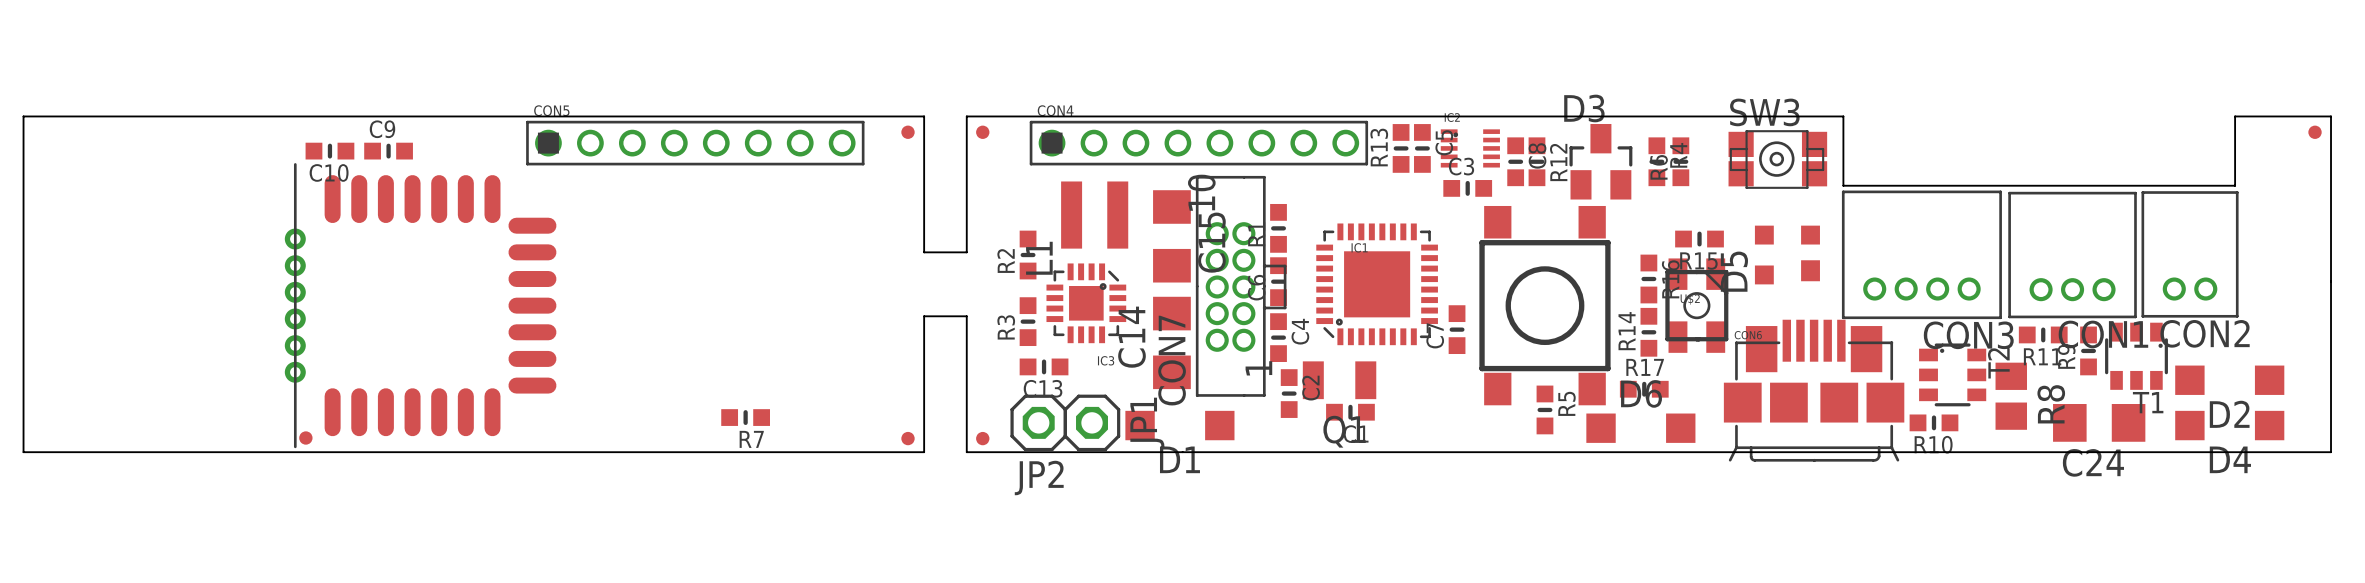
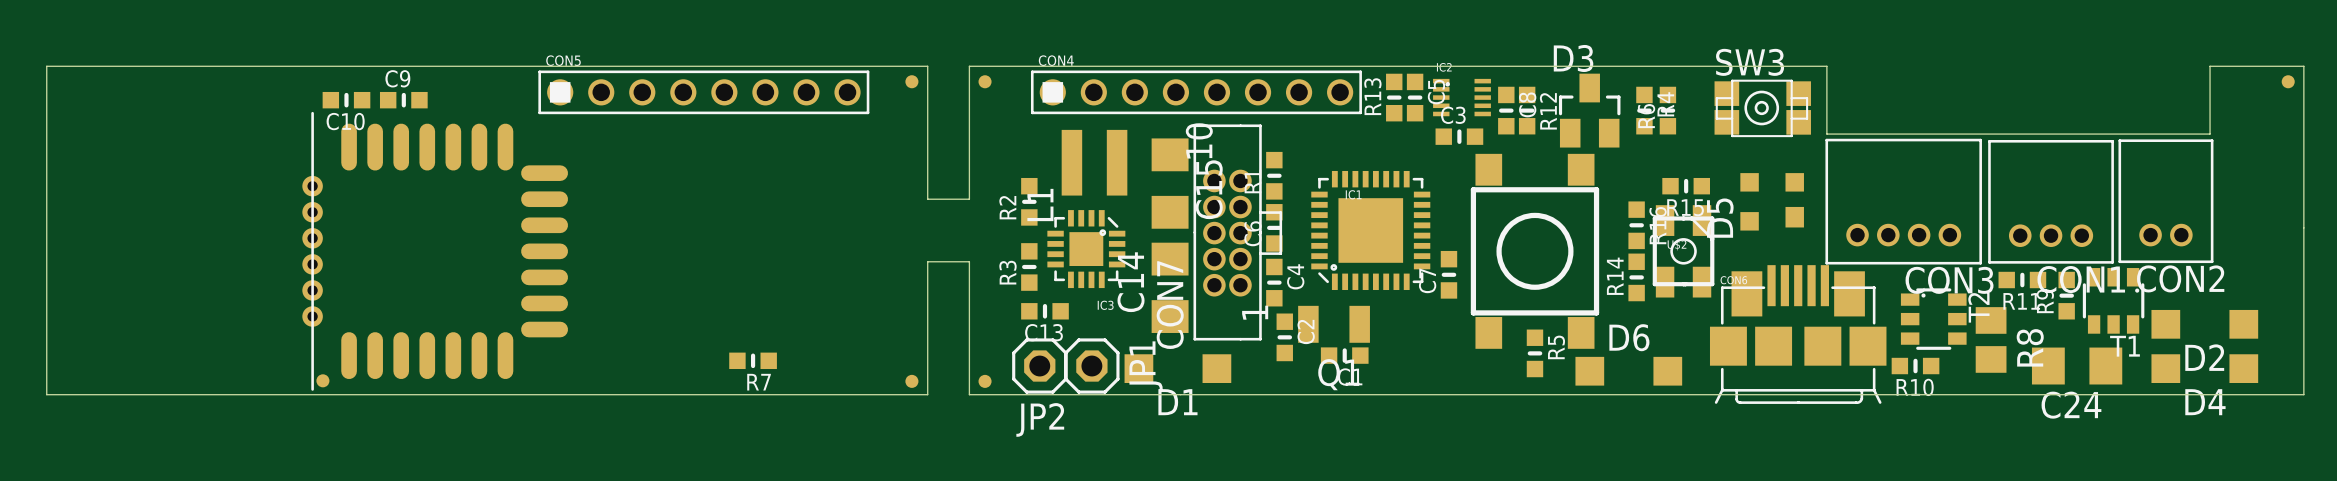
R17: (1644, 389) -> none

